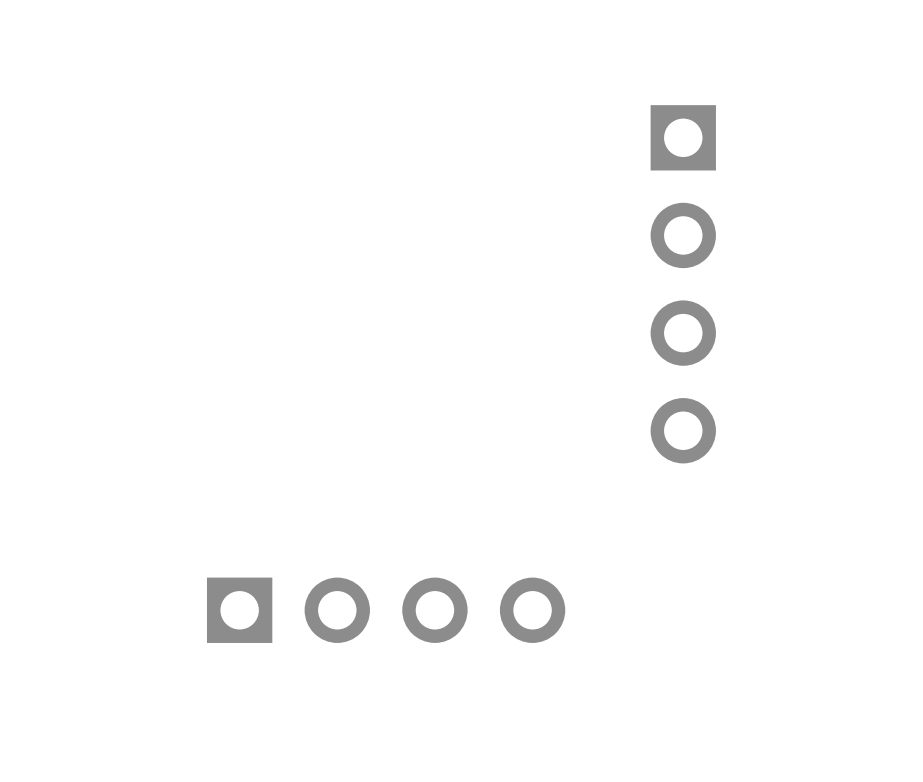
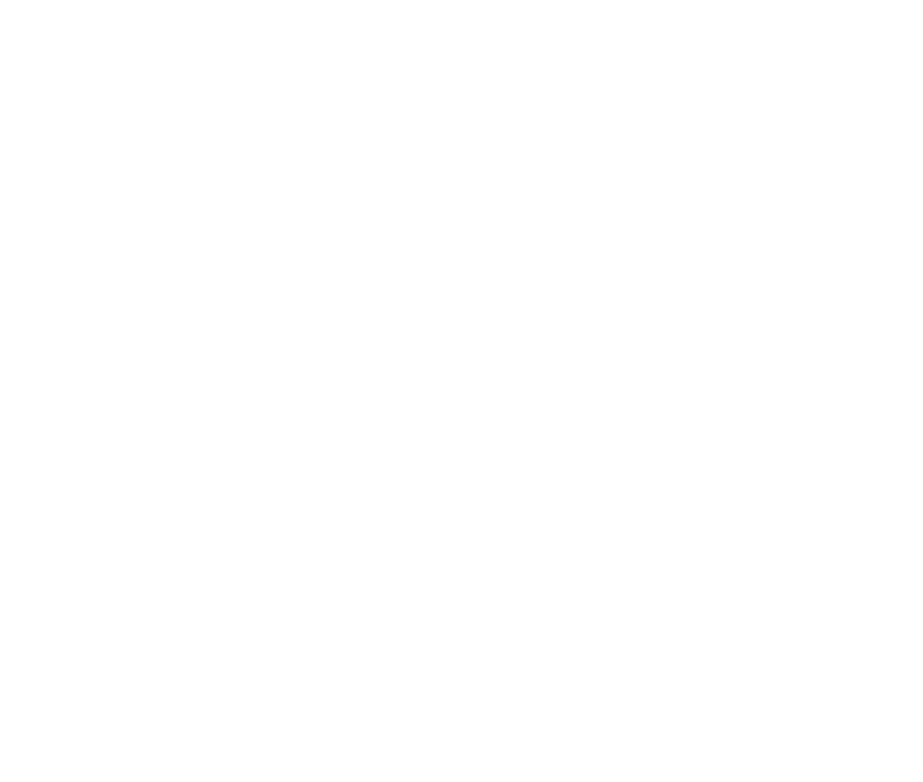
part: (683, 284) -> none
part: (386, 610) -> none

